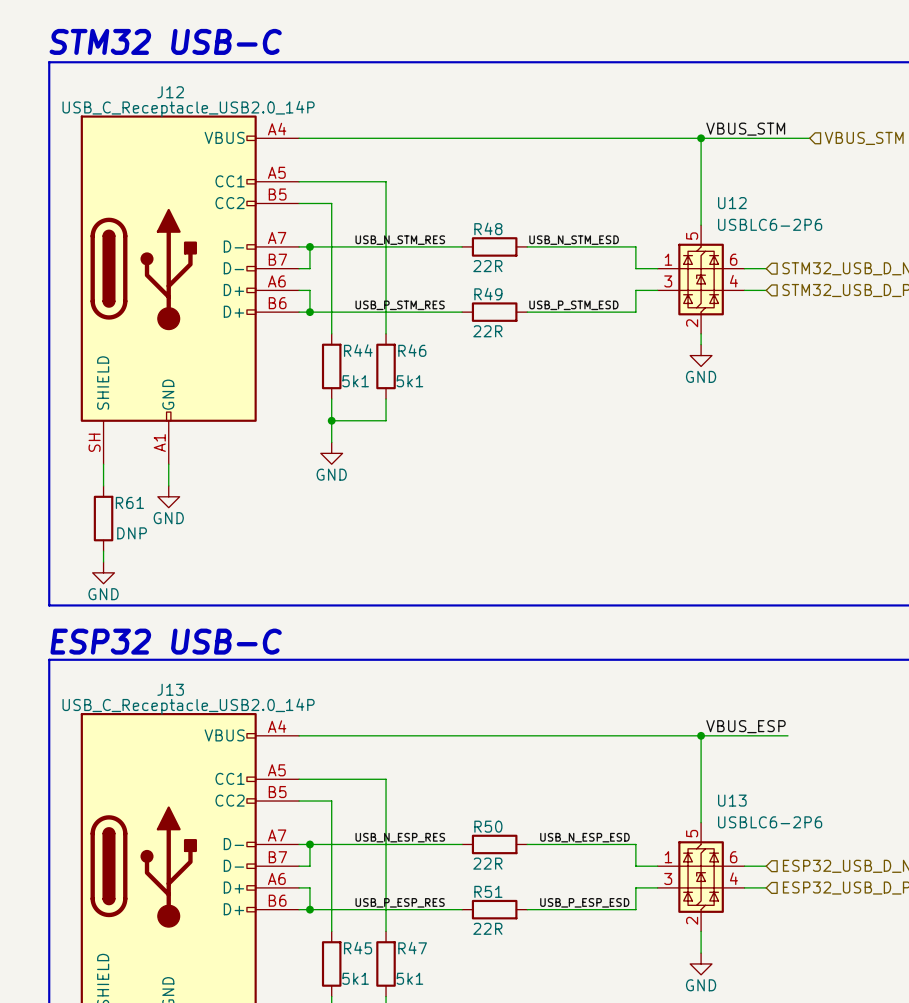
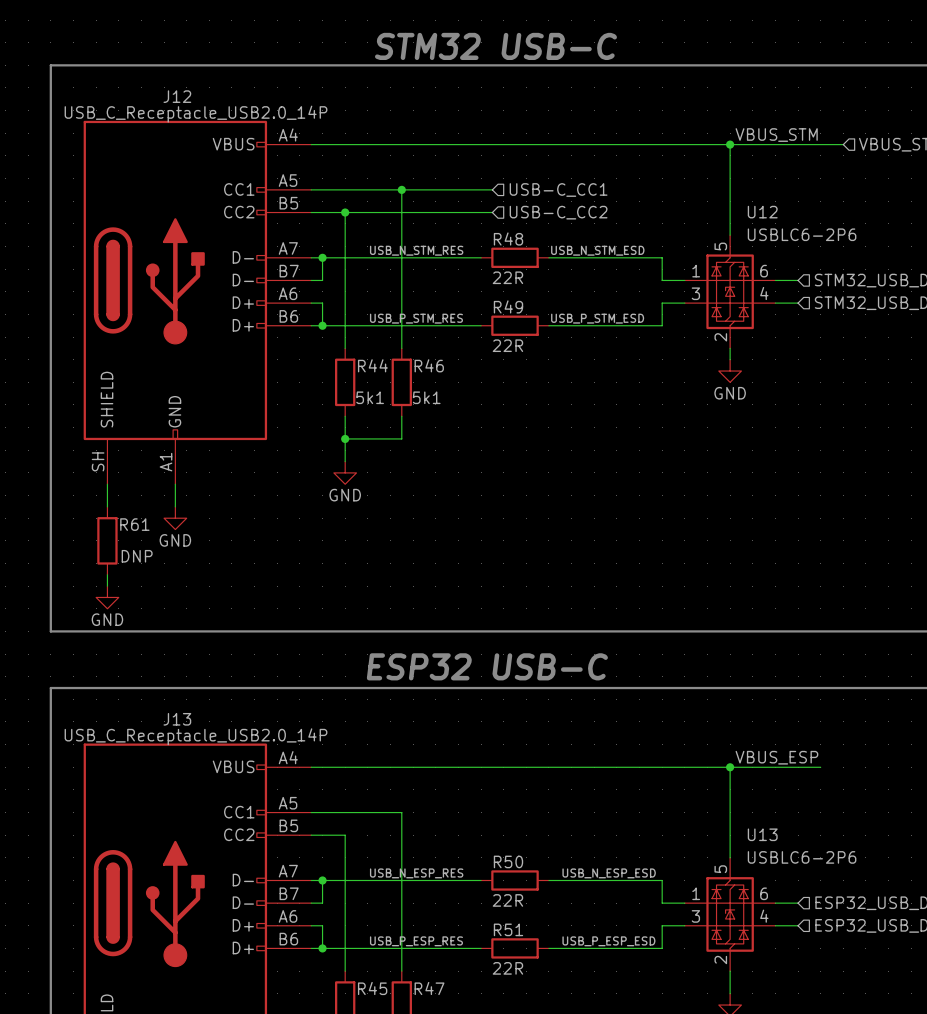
text: STM32 USB-C (165, 41) -> none
text: none -> STM32 USB-C (495, 46)
wire: none -> (401, 189) (492, 189)
junction: none -> (401, 189)
hierarchical label: none -> USB-C_CC1 (558, 190)
wire: none -> (345, 212) (492, 212)
junction: none -> (345, 212)
hierarchical label: none -> USB-C_CC2 (558, 212)
text: none -> ESP32 USB-C (487, 666)
text: ESP32 USB-C (166, 641) -> none

